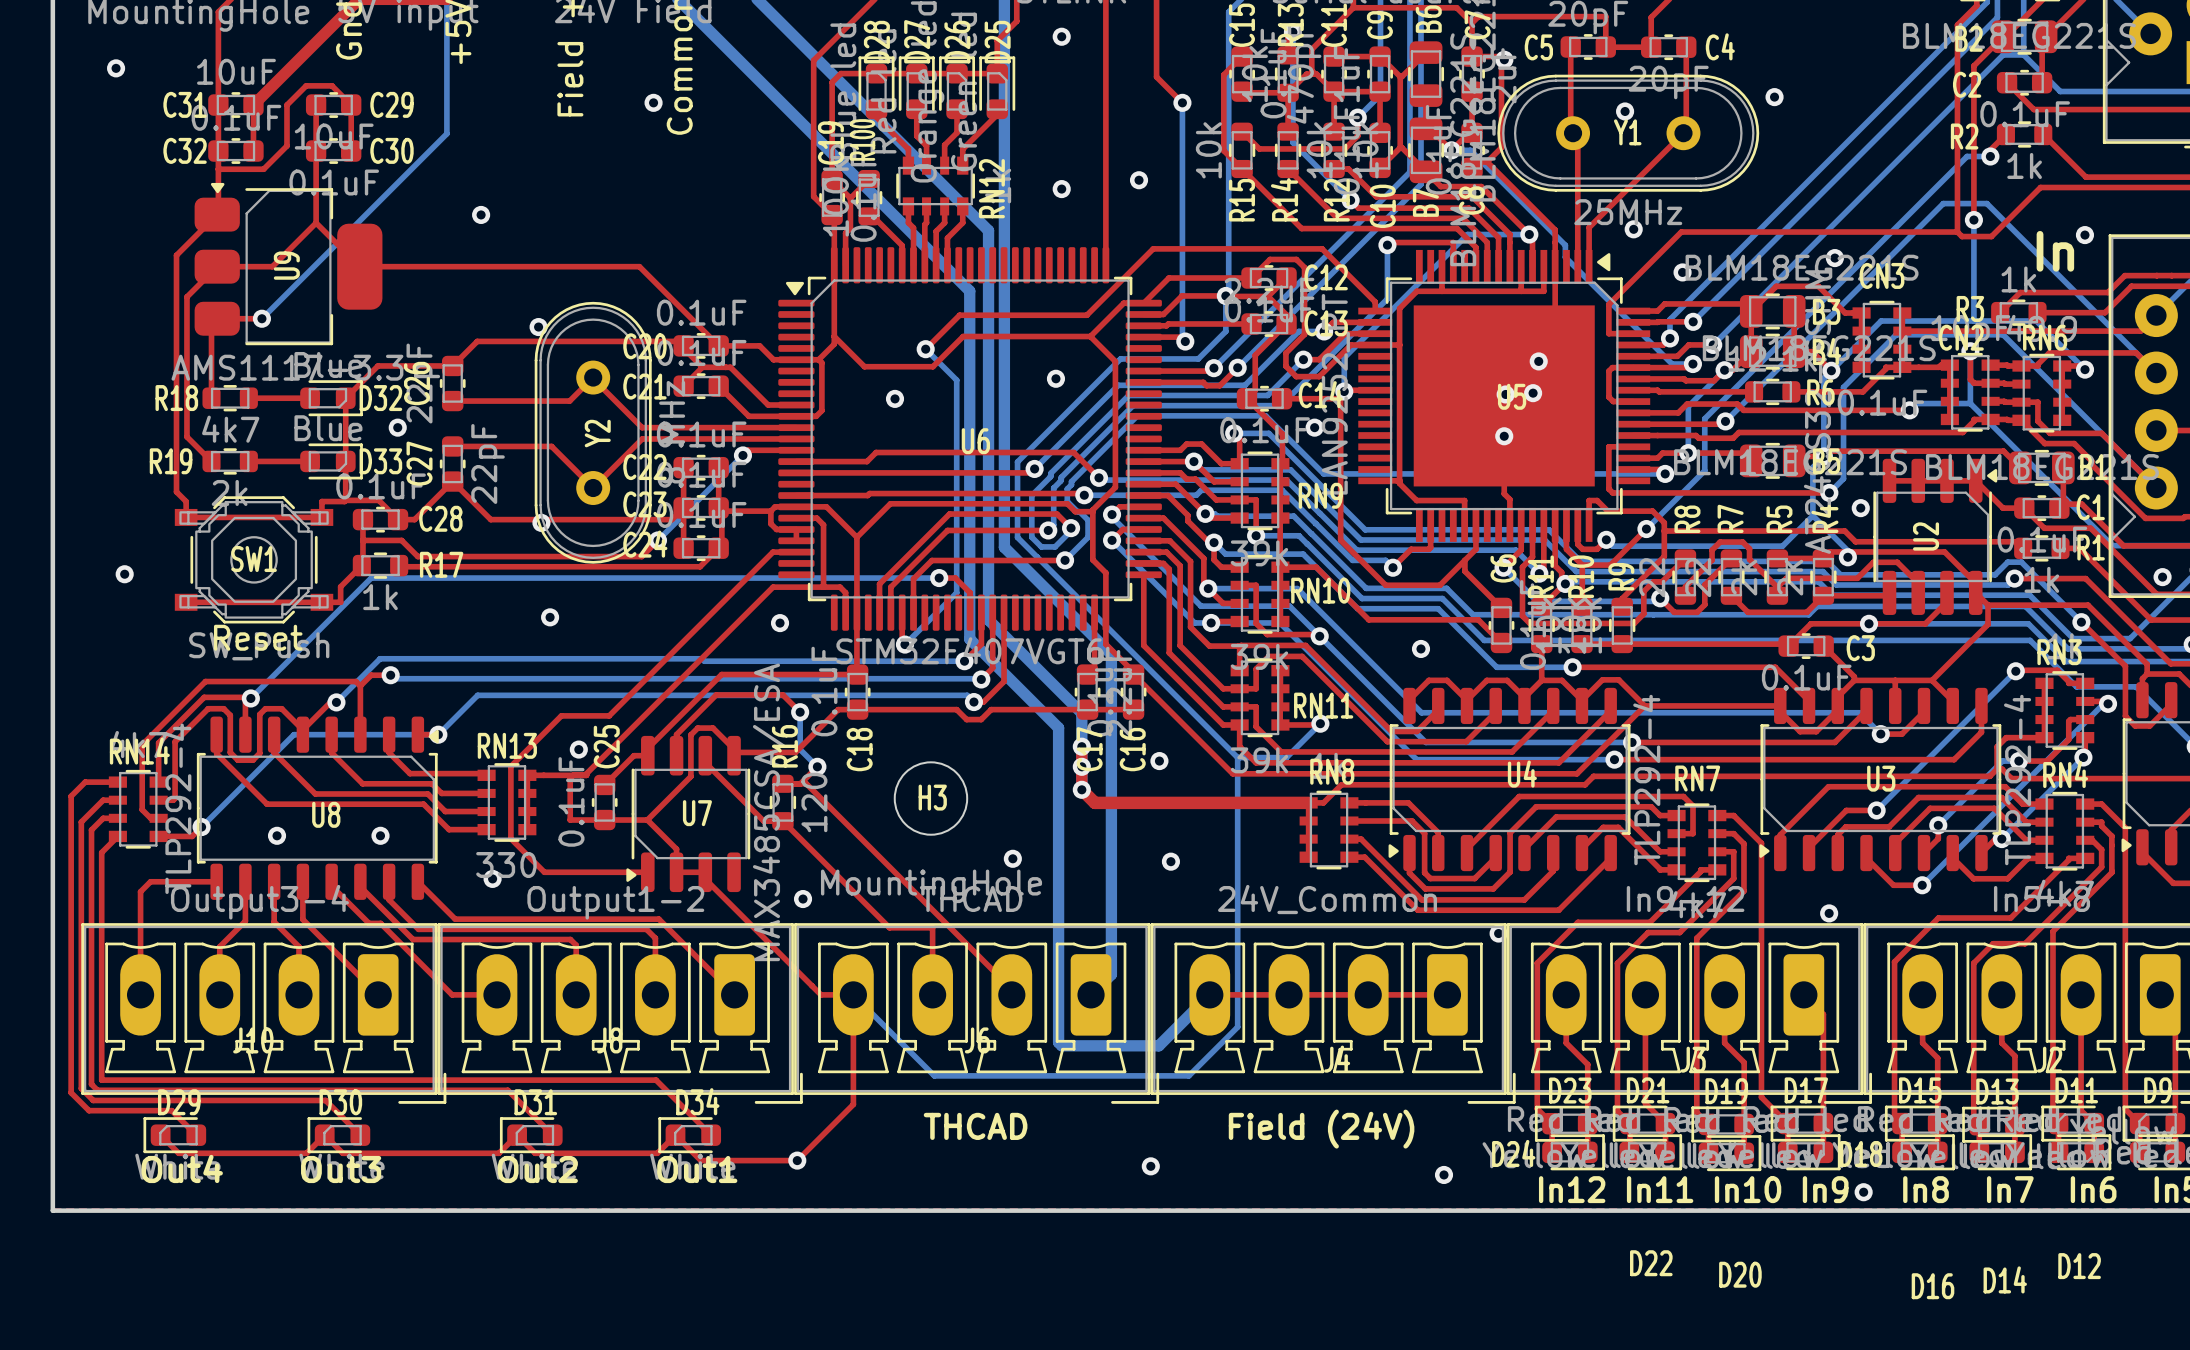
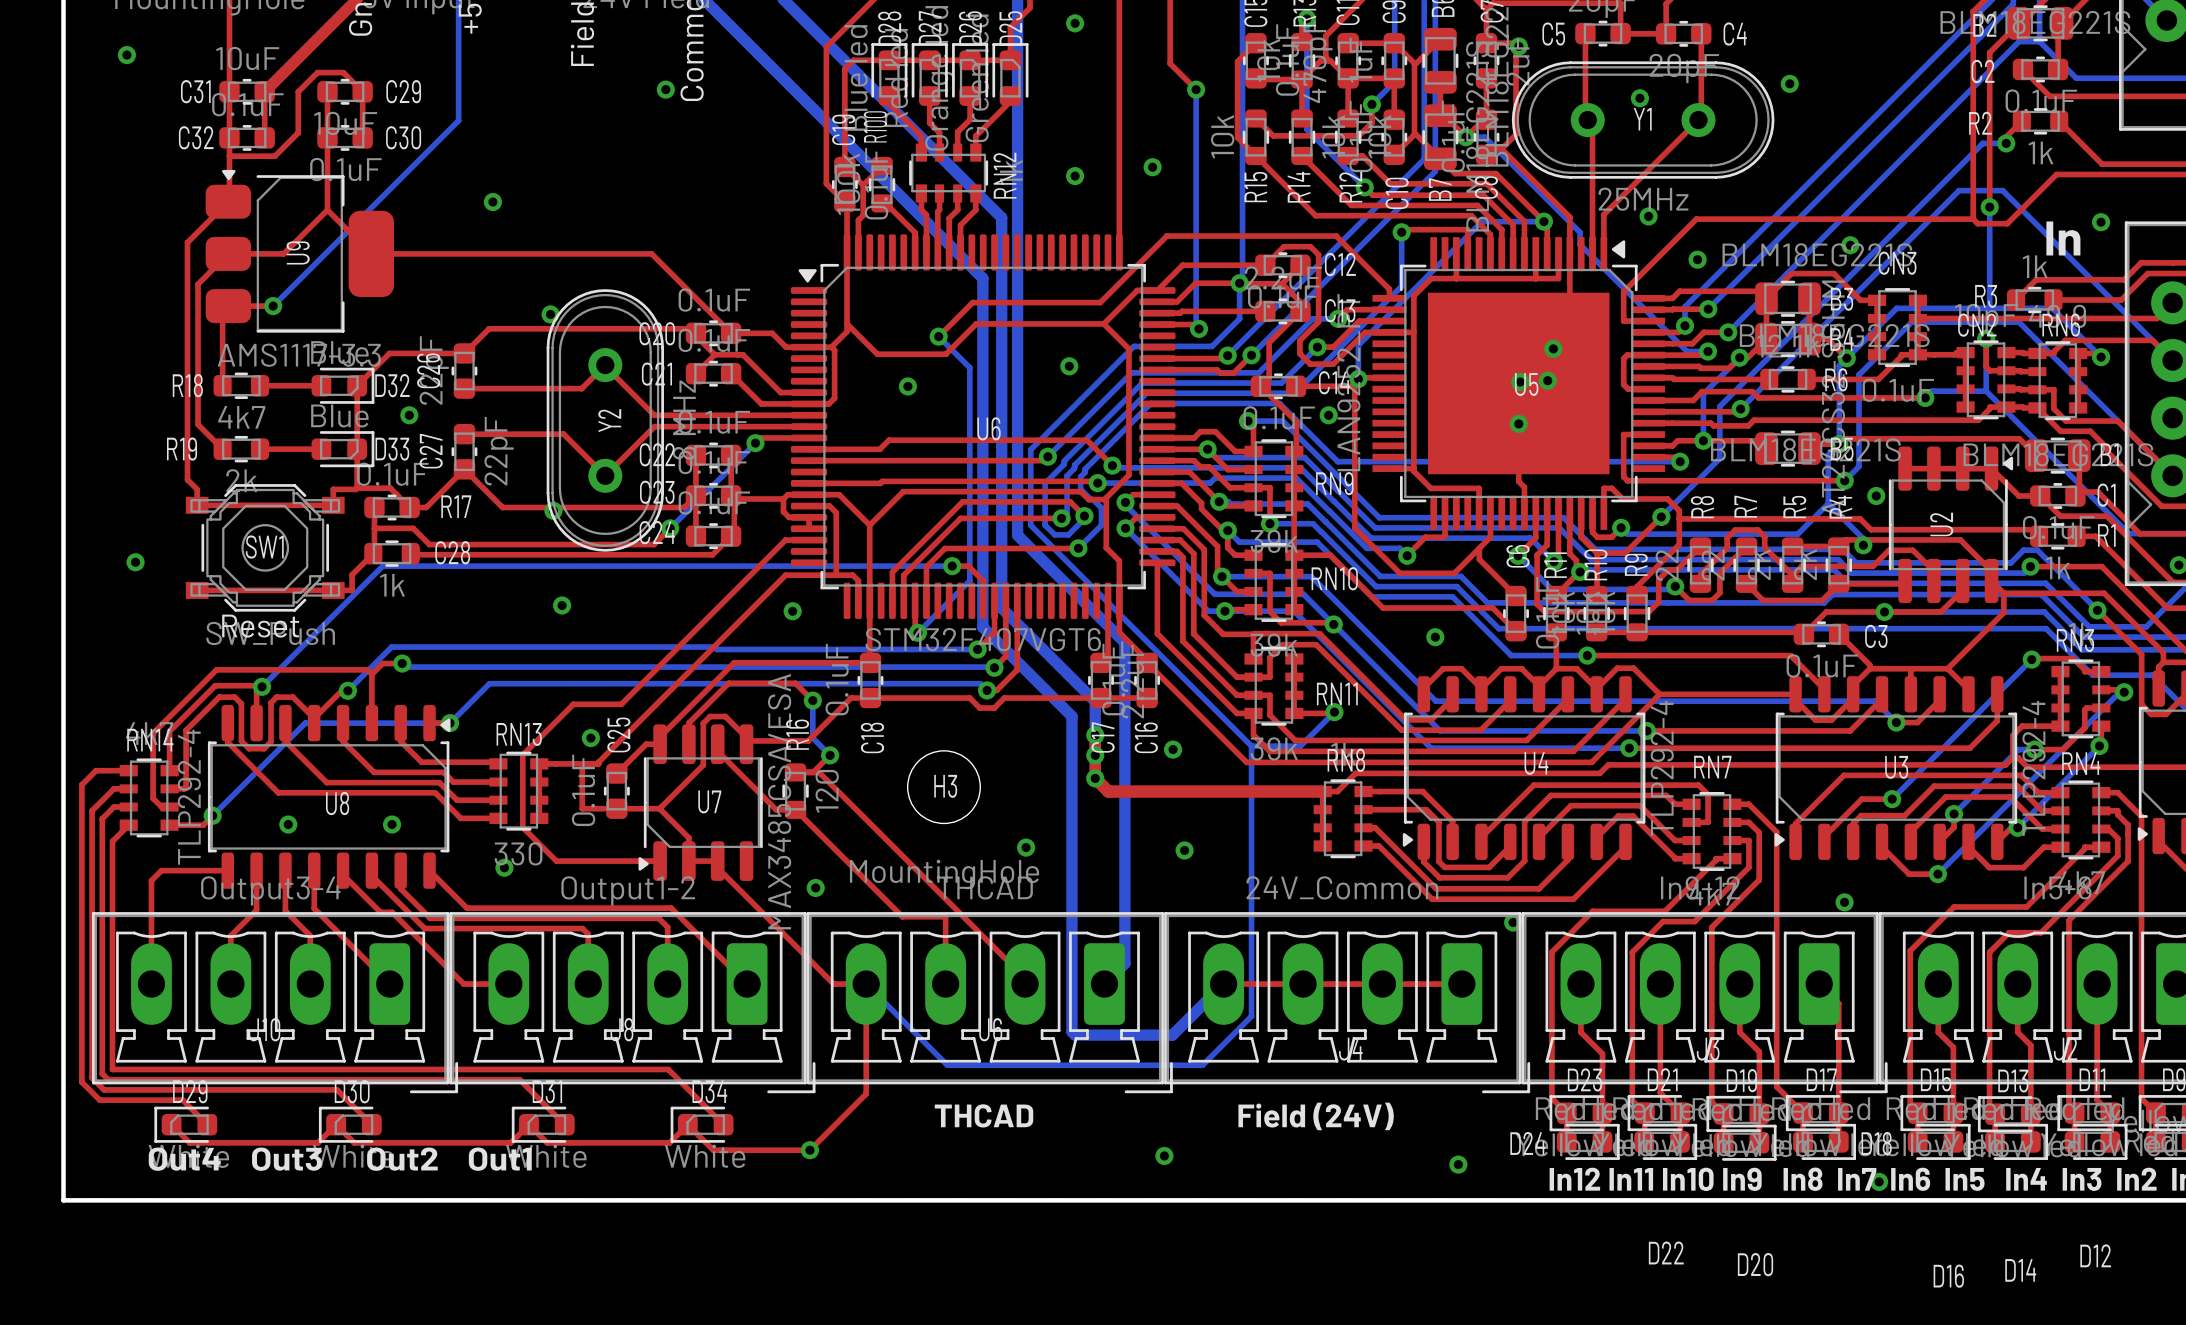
C28 name position: C28 (440, 518) -> C28 (452, 552)
R17 name position: R17 (441, 564) -> R17 (456, 506)

